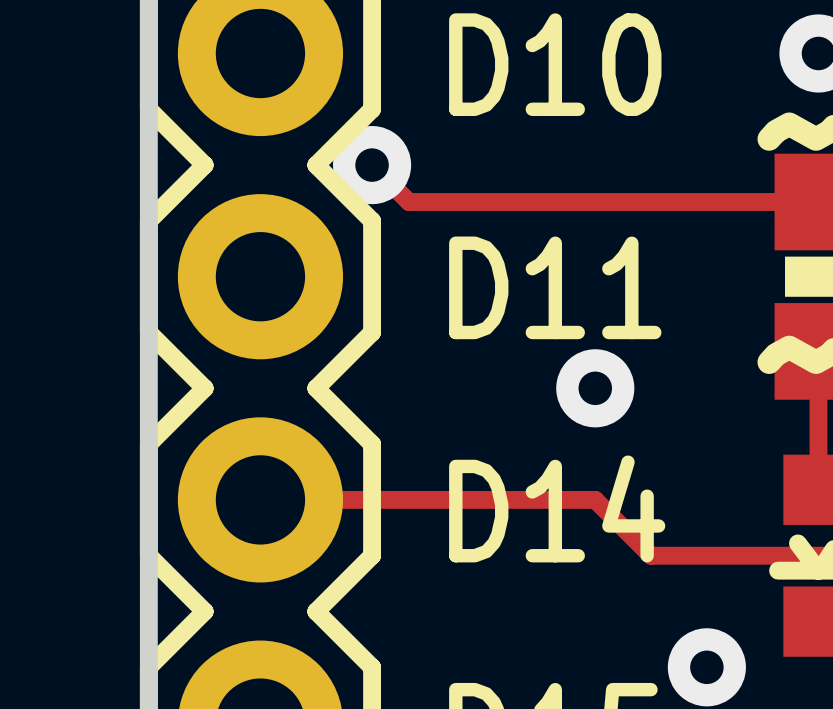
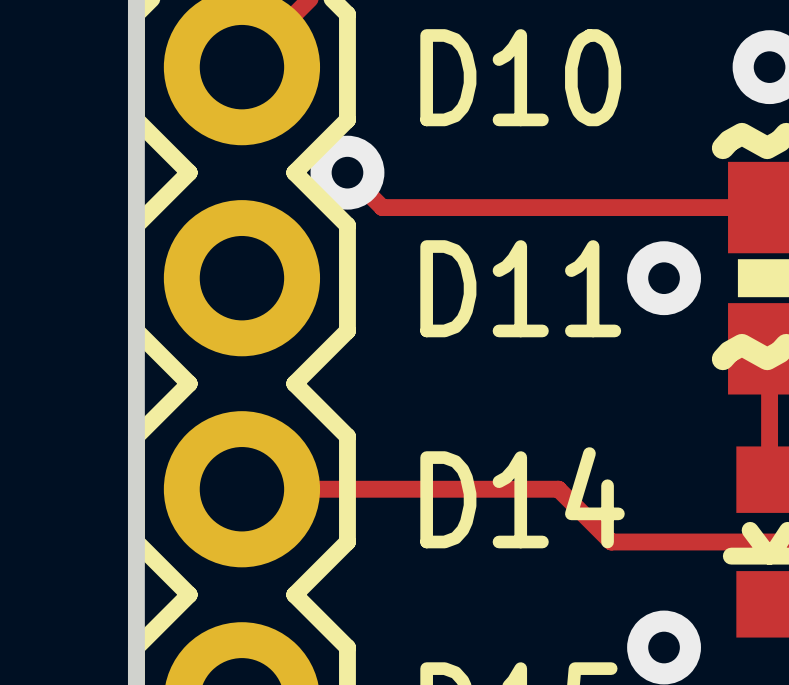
via position: (595, 388) -> (664, 278)

